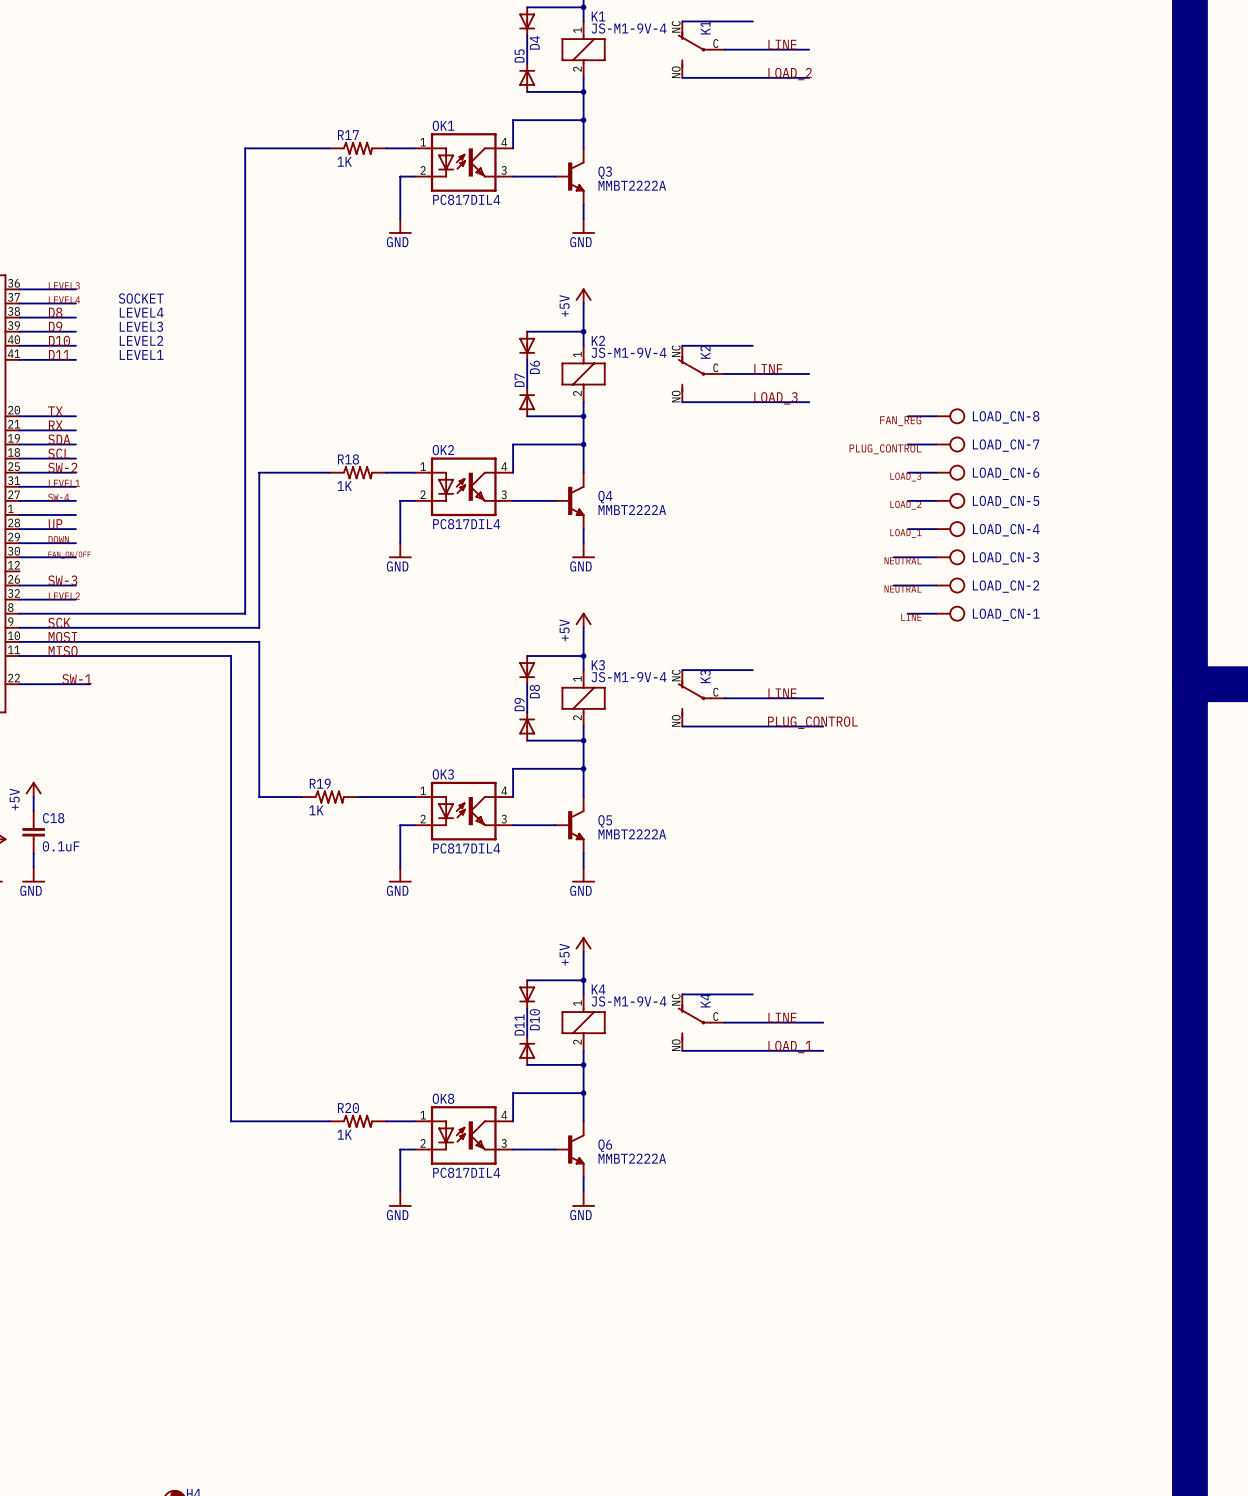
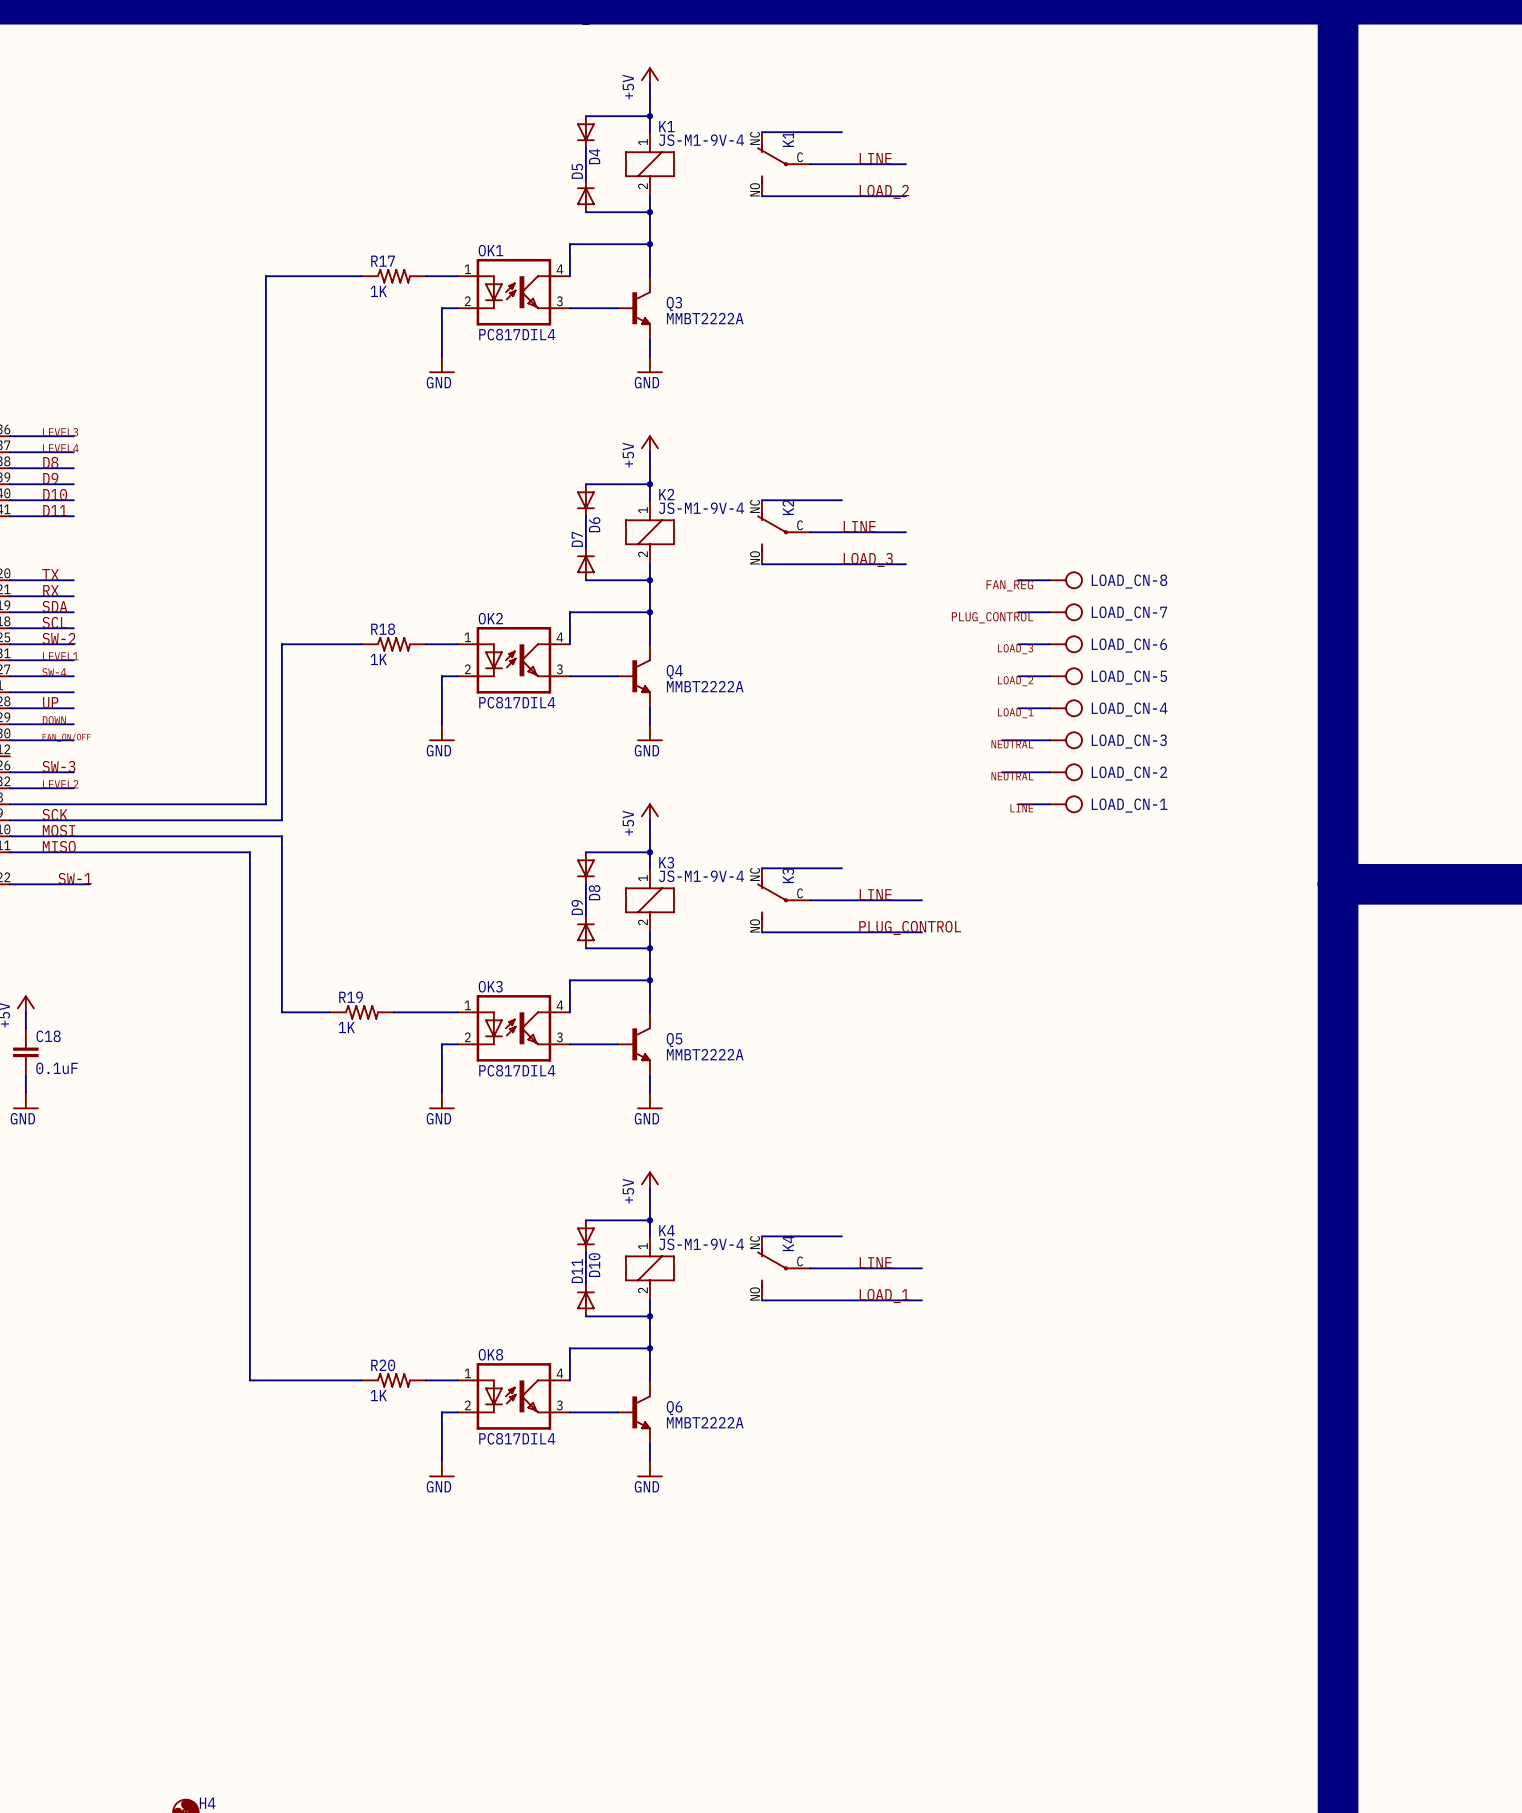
text: SOCKET (141, 298) -> none
text: LEVEL4 (141, 312) -> none
text: LEVEL3 (141, 326) -> none
text: LEVEL2 (141, 340) -> none
text: LEVEL1 (141, 354) -> none

